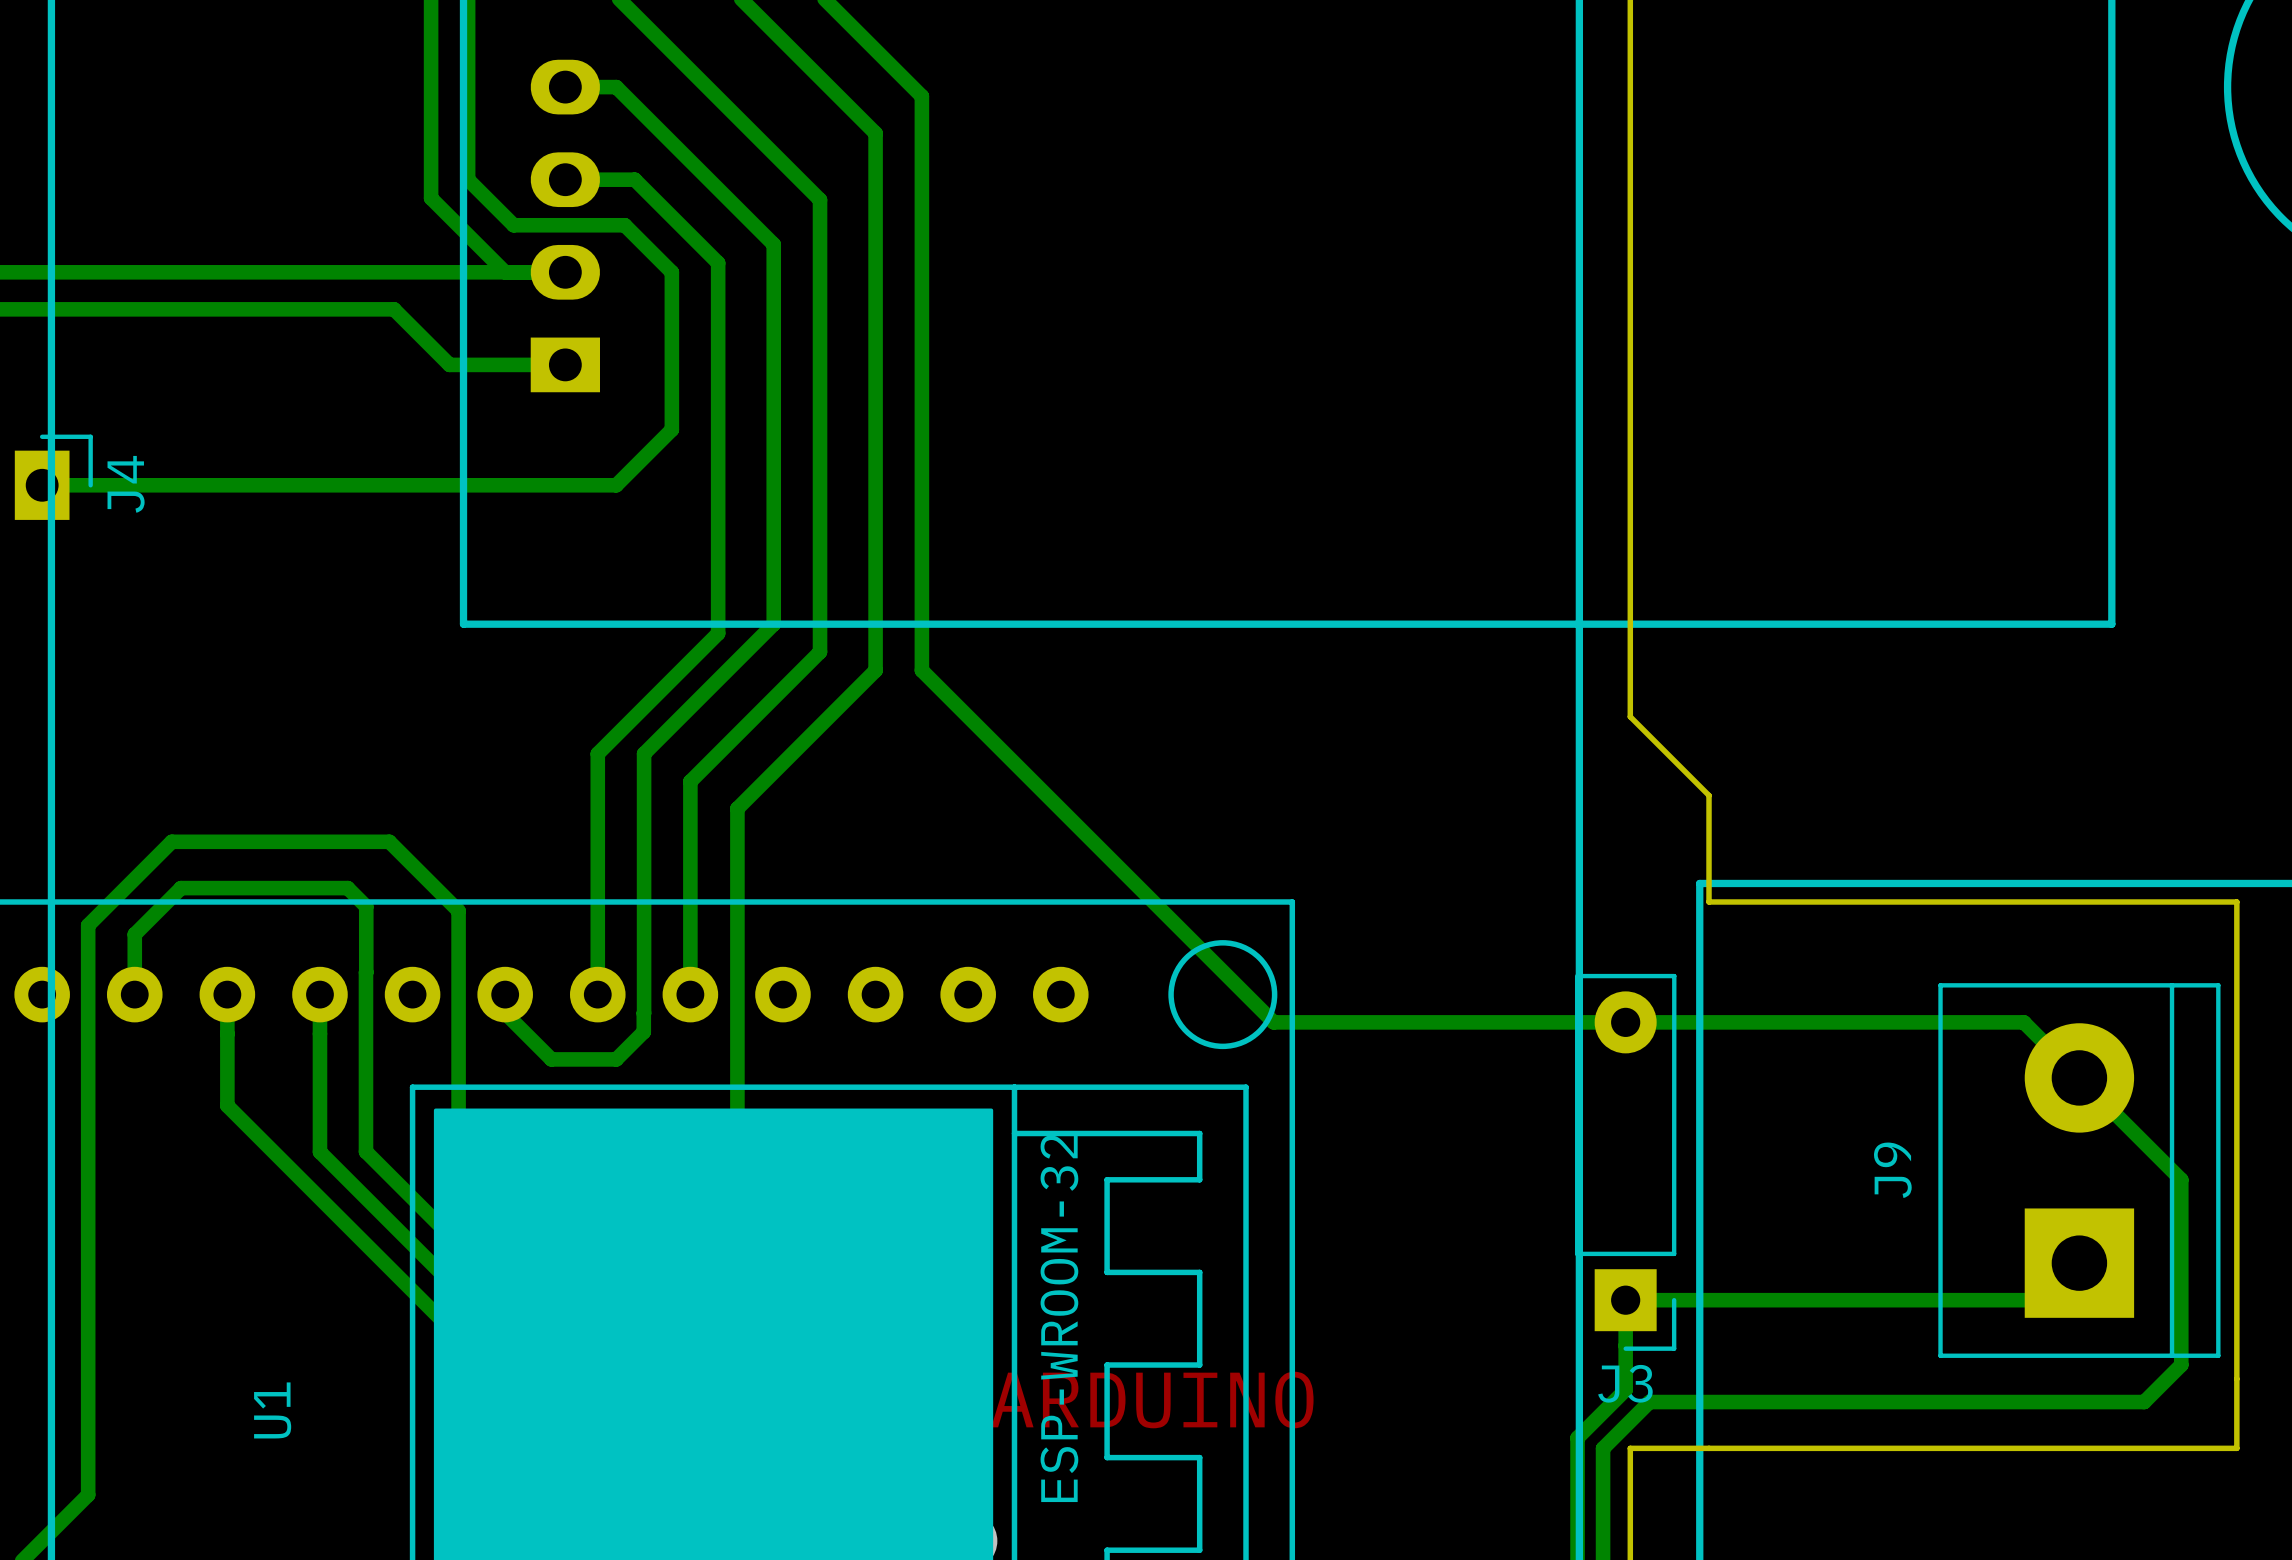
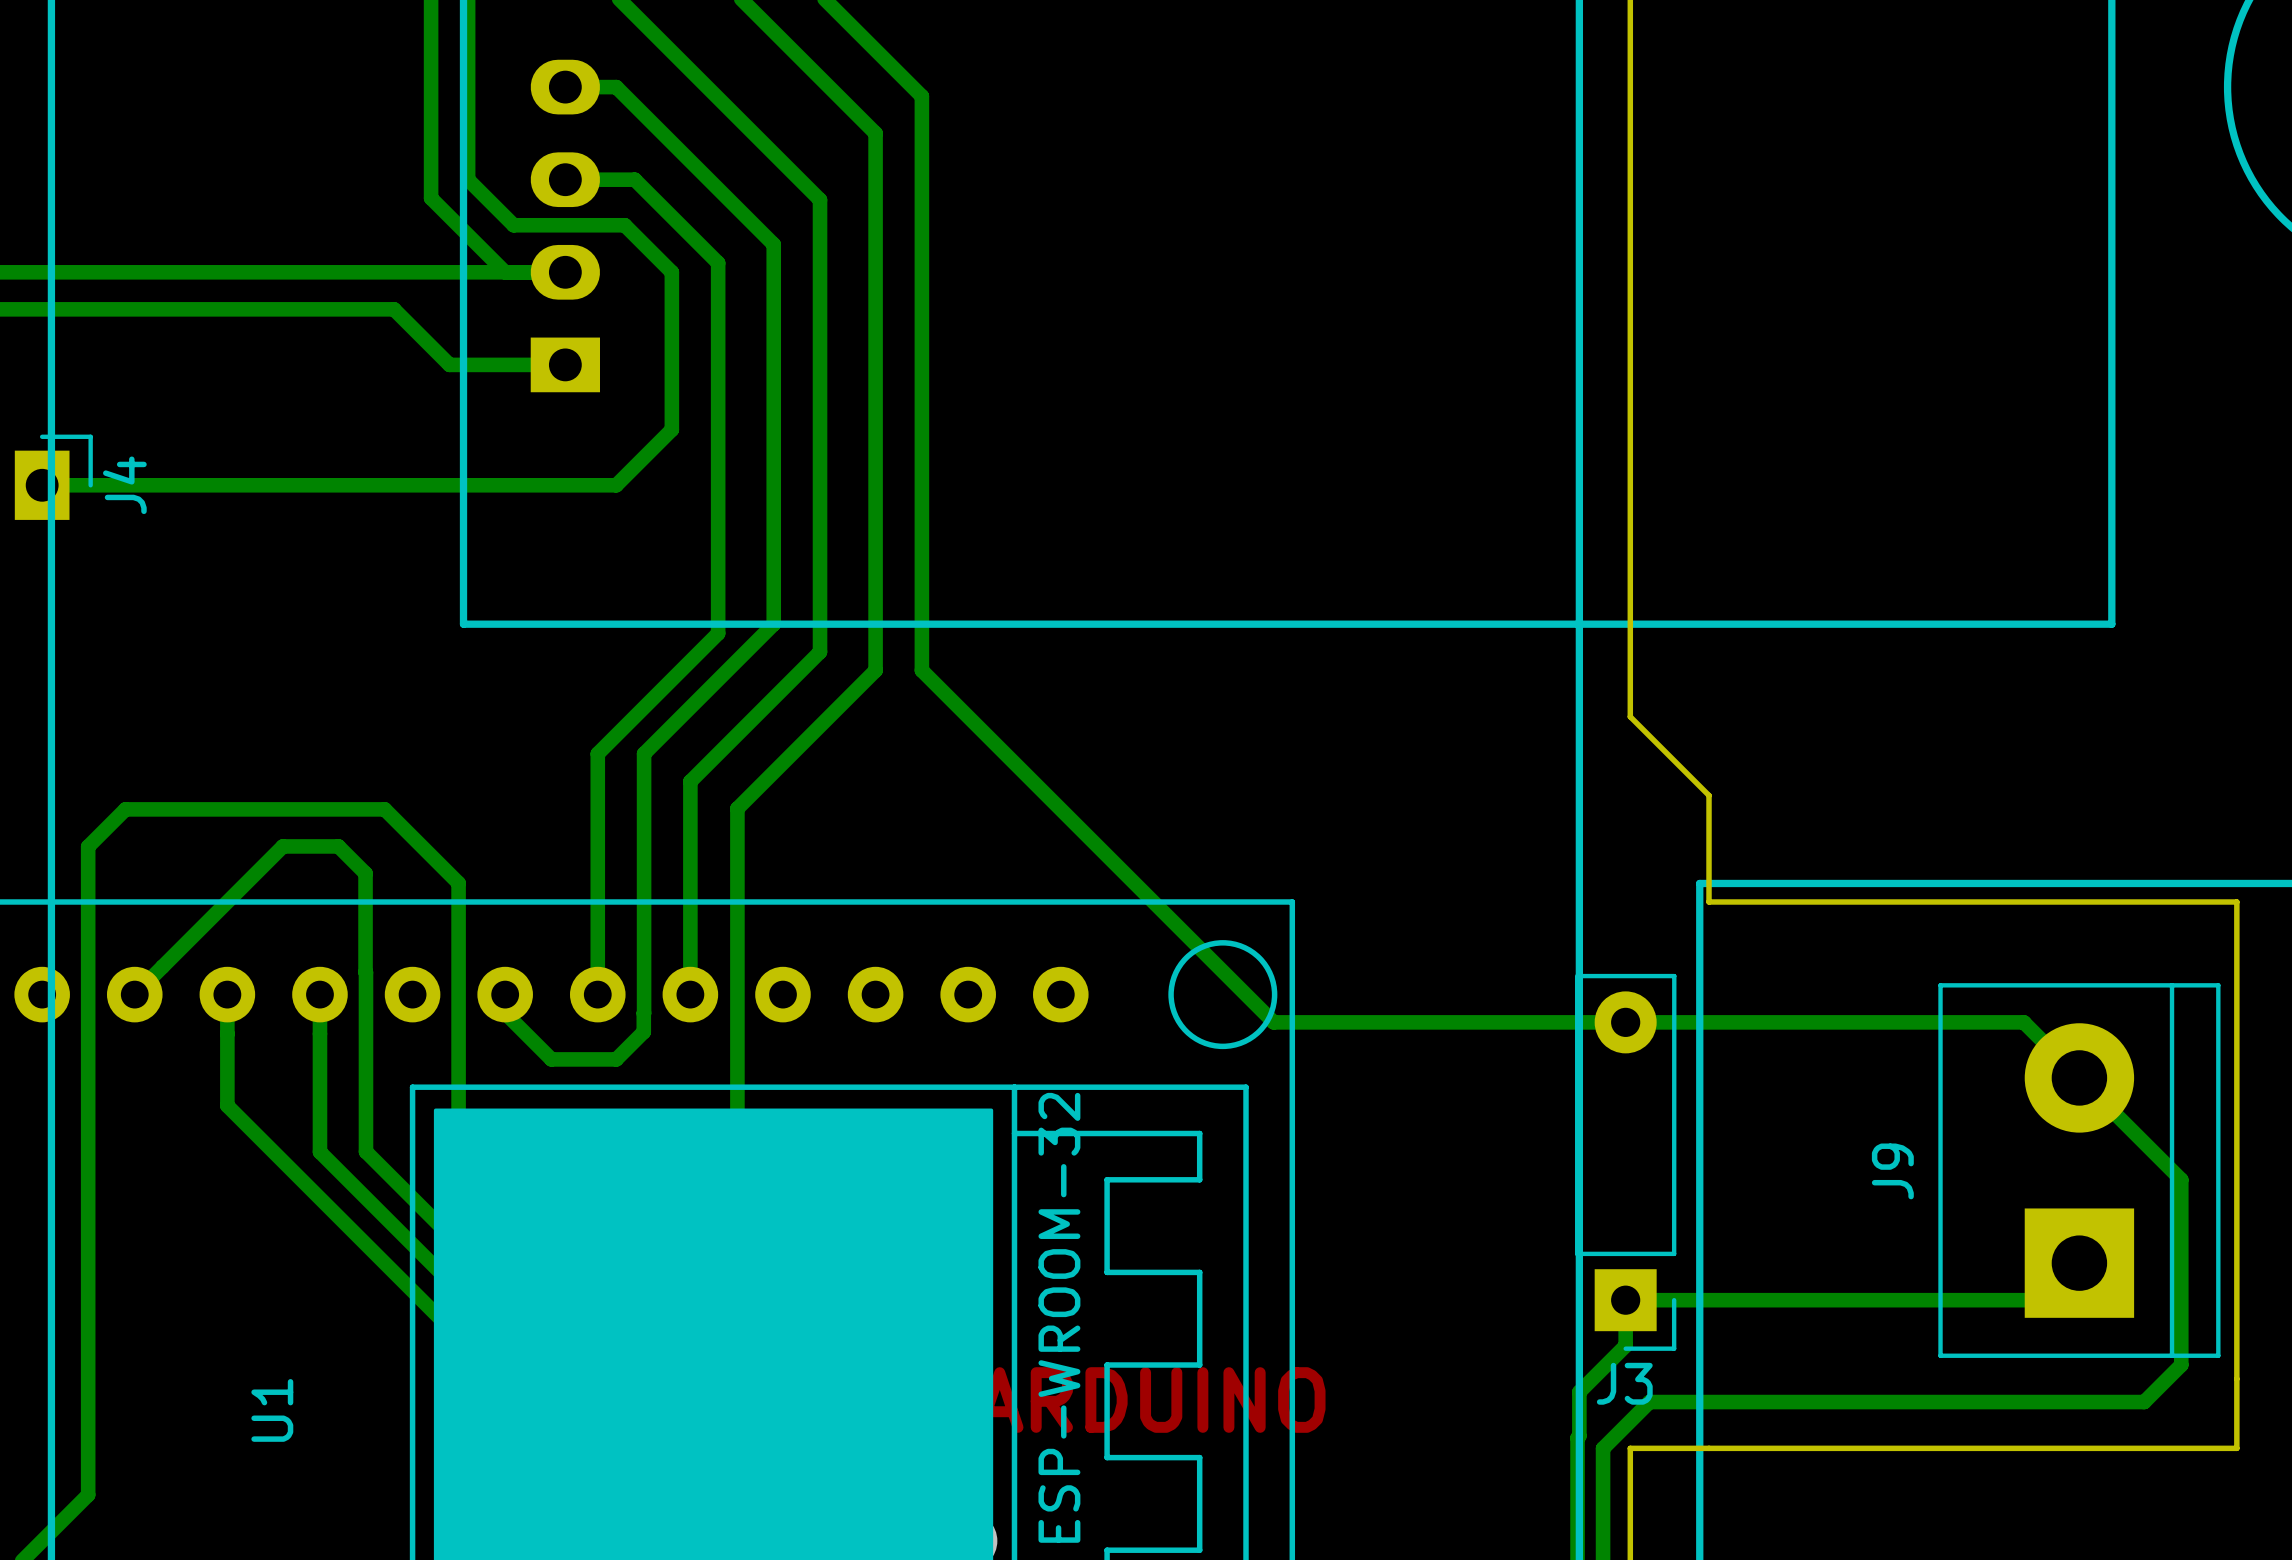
bottom track: (458, 910) (389, 841) (171, 841) (88, 925) -> (458, 910) (458, 883) (384, 809) (125, 809) (88, 846) (88, 925)
bottom track: (366, 972) (366, 906) (347, 888) (181, 888) (134, 934) (134, 994) -> (365, 972) (365, 873) (338, 846) (282, 846) (134, 994)
bottom track: (1625, 1345) (1625, 1389) (1579, 1436) -> (1625, 1345) (1579, 1392) (1579, 1436)

